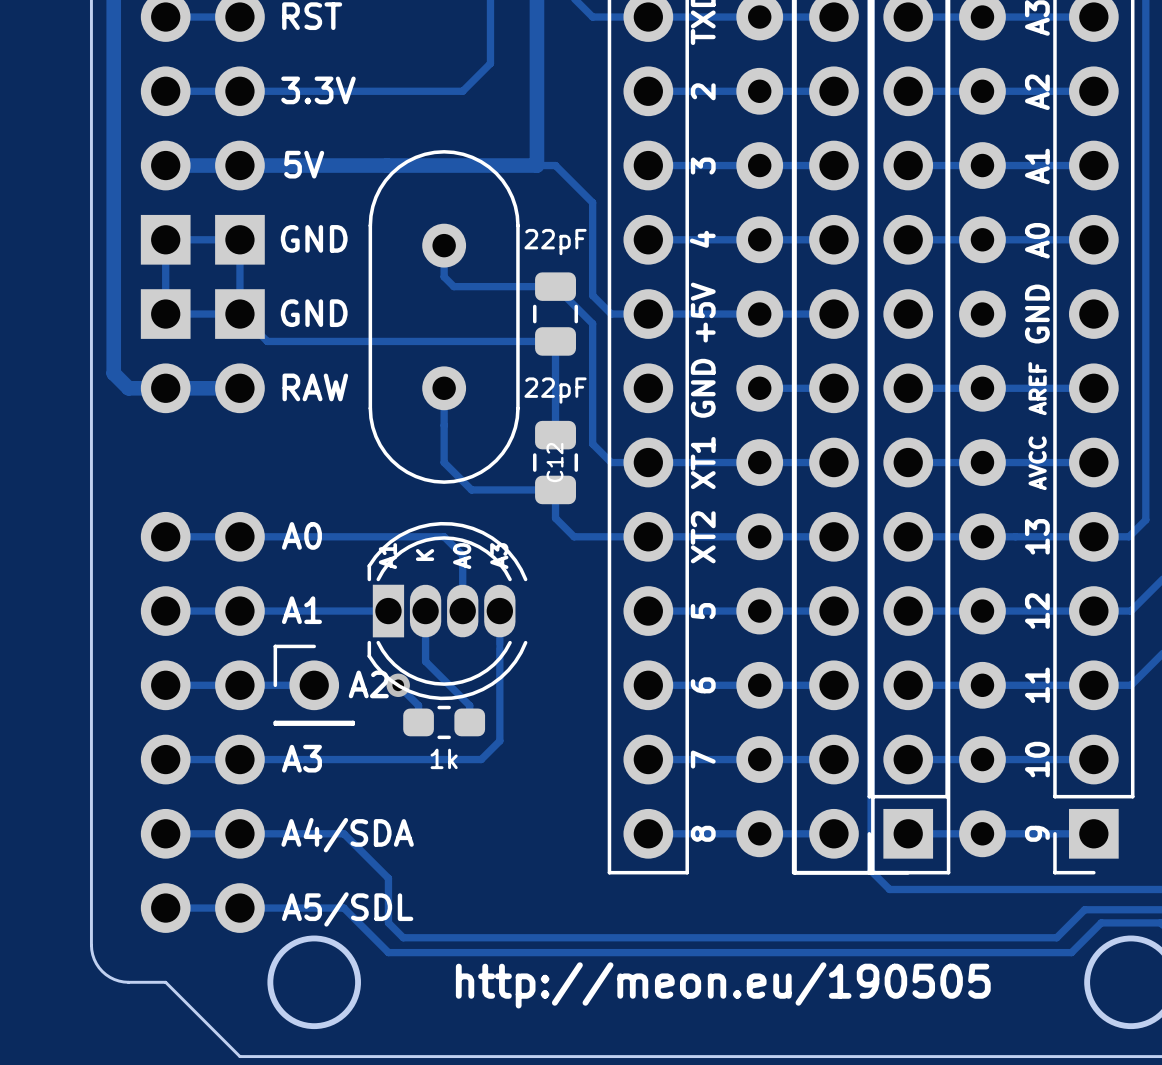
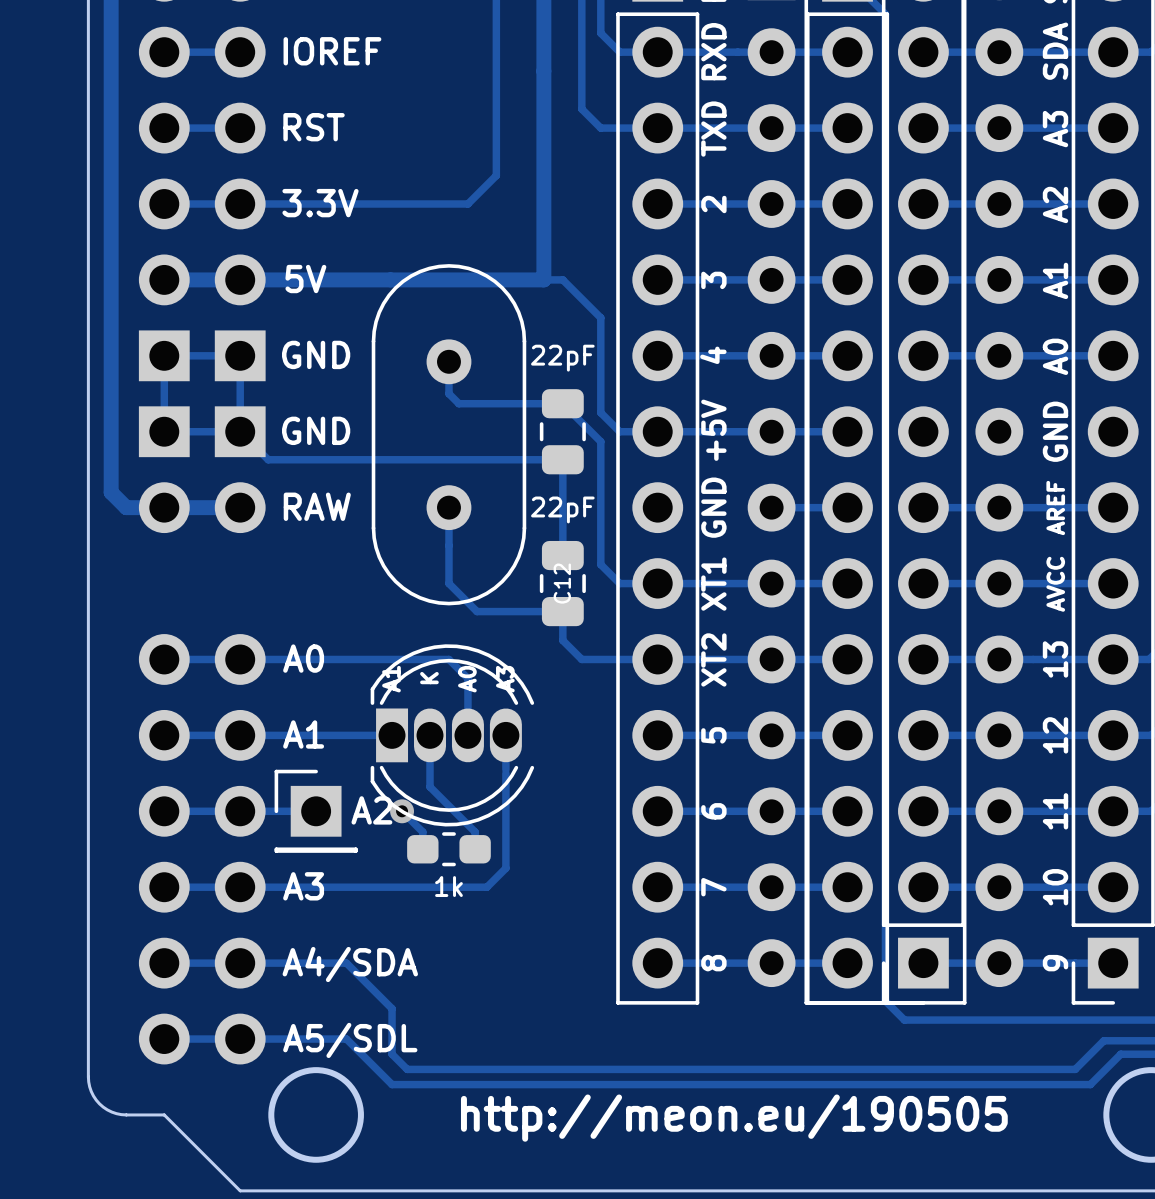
part footprint: [273, 644, 355, 726] -> [274, 769, 358, 853]

